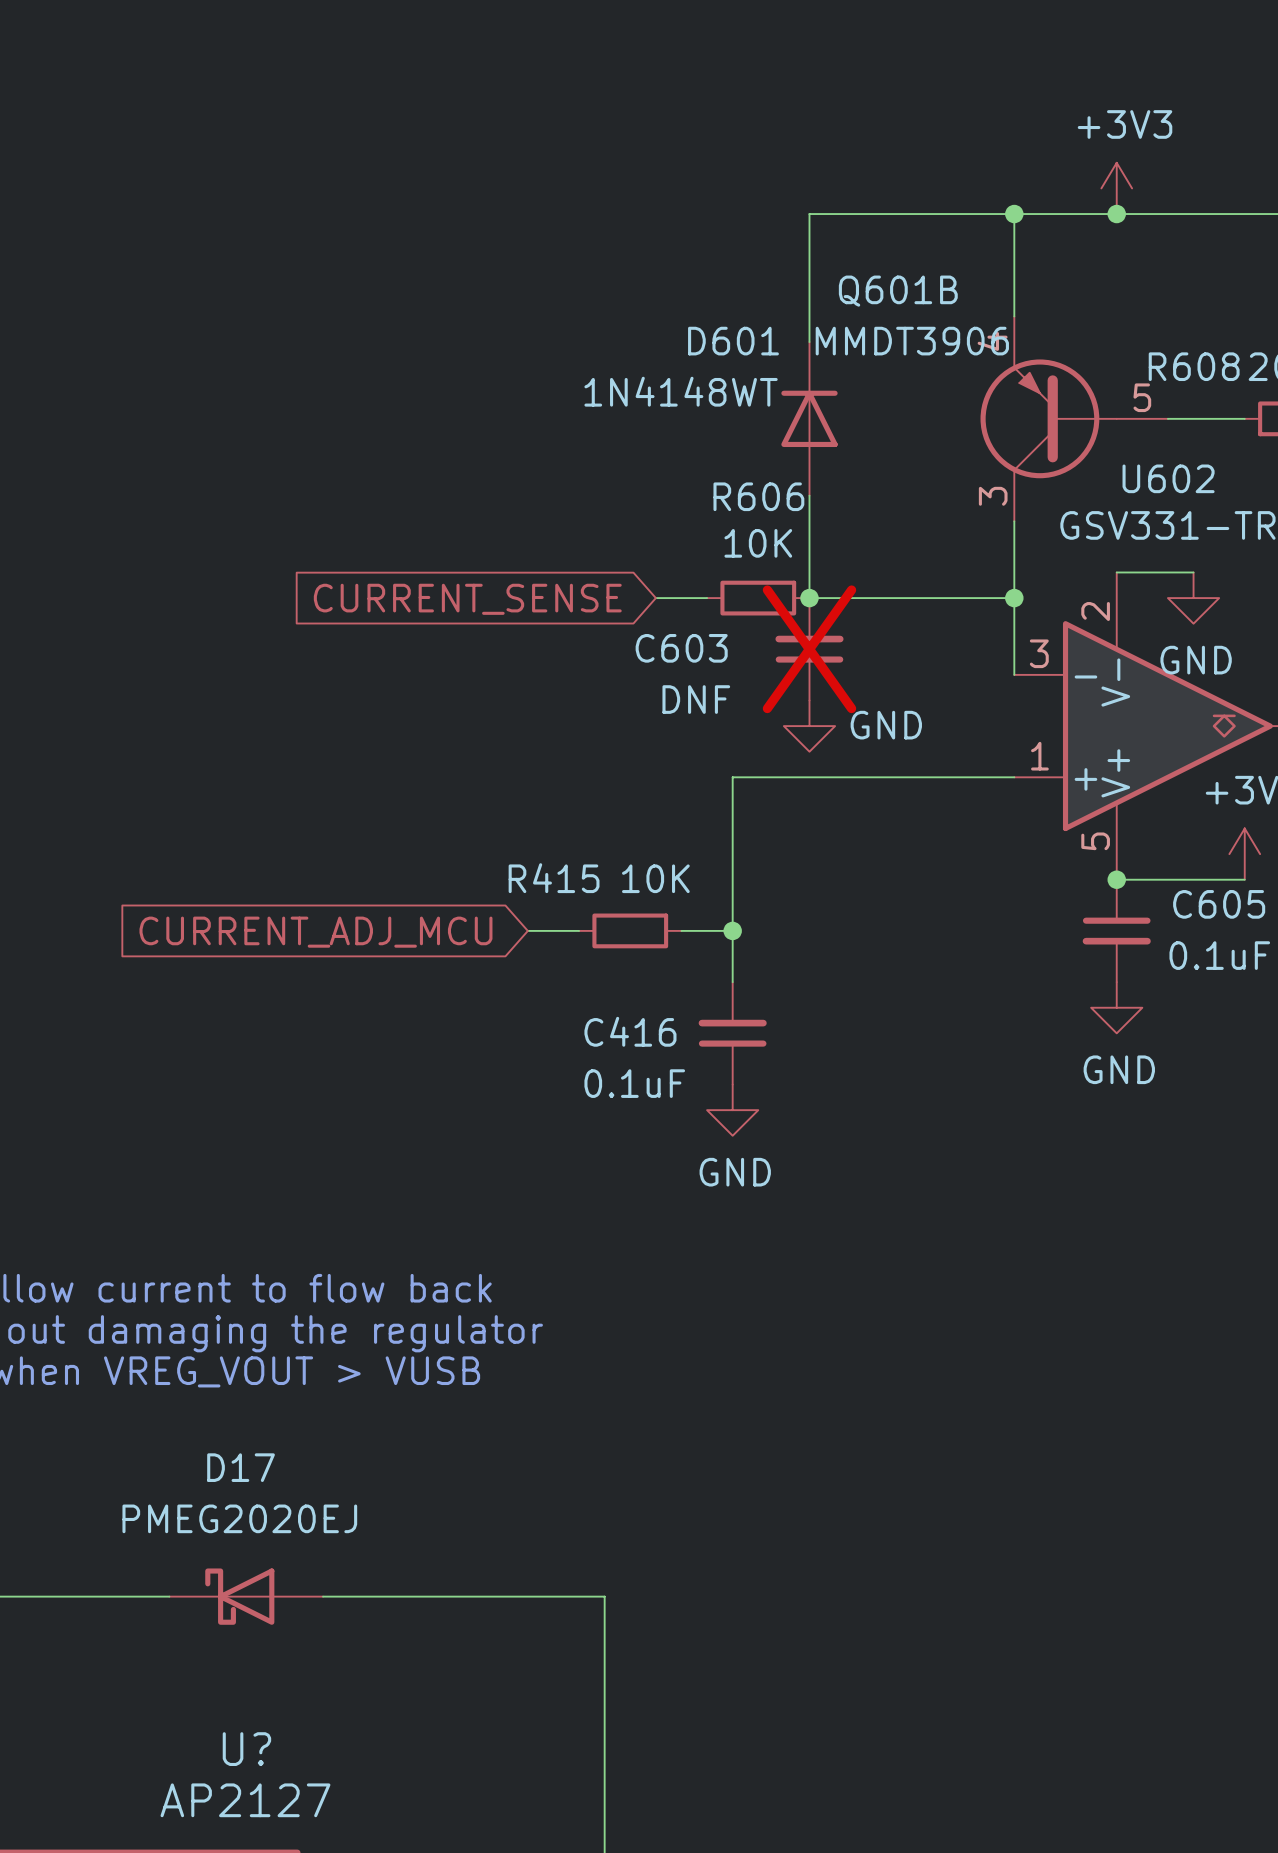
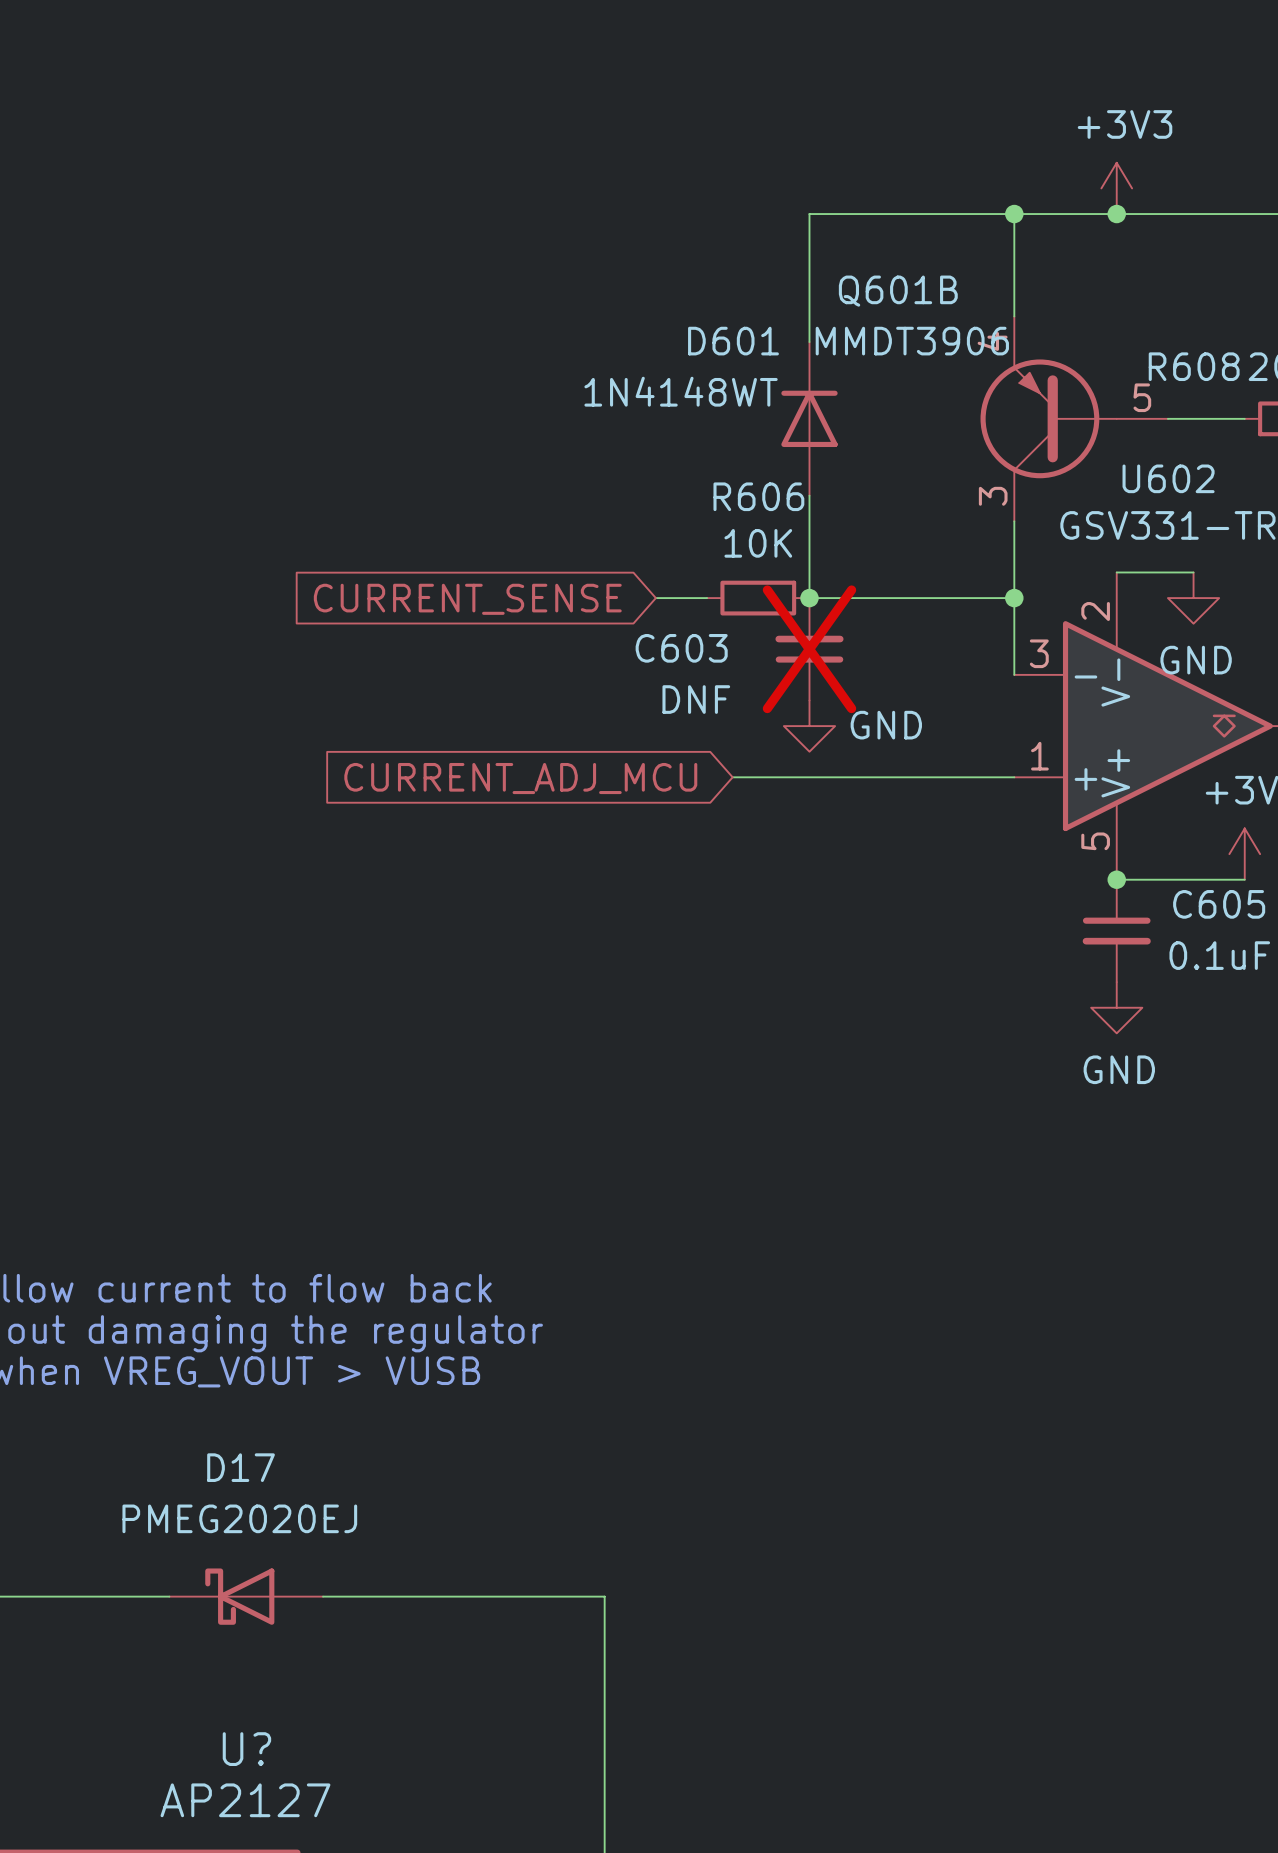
wire: (732, 777) (732, 982) -> none
wire: (527, 930) (579, 930) -> none
R415: 10K (630, 930) -> none
wire: (681, 930) (732, 930) -> none
junction: (732, 930) -> none
global label position: CURRENT_ADJ_MCU (315, 932) -> CURRENT_ADJ_MCU (520, 778)
C416: 0.1uF (732, 1033) -> none
power symbol: GND (732, 1110) -> none

